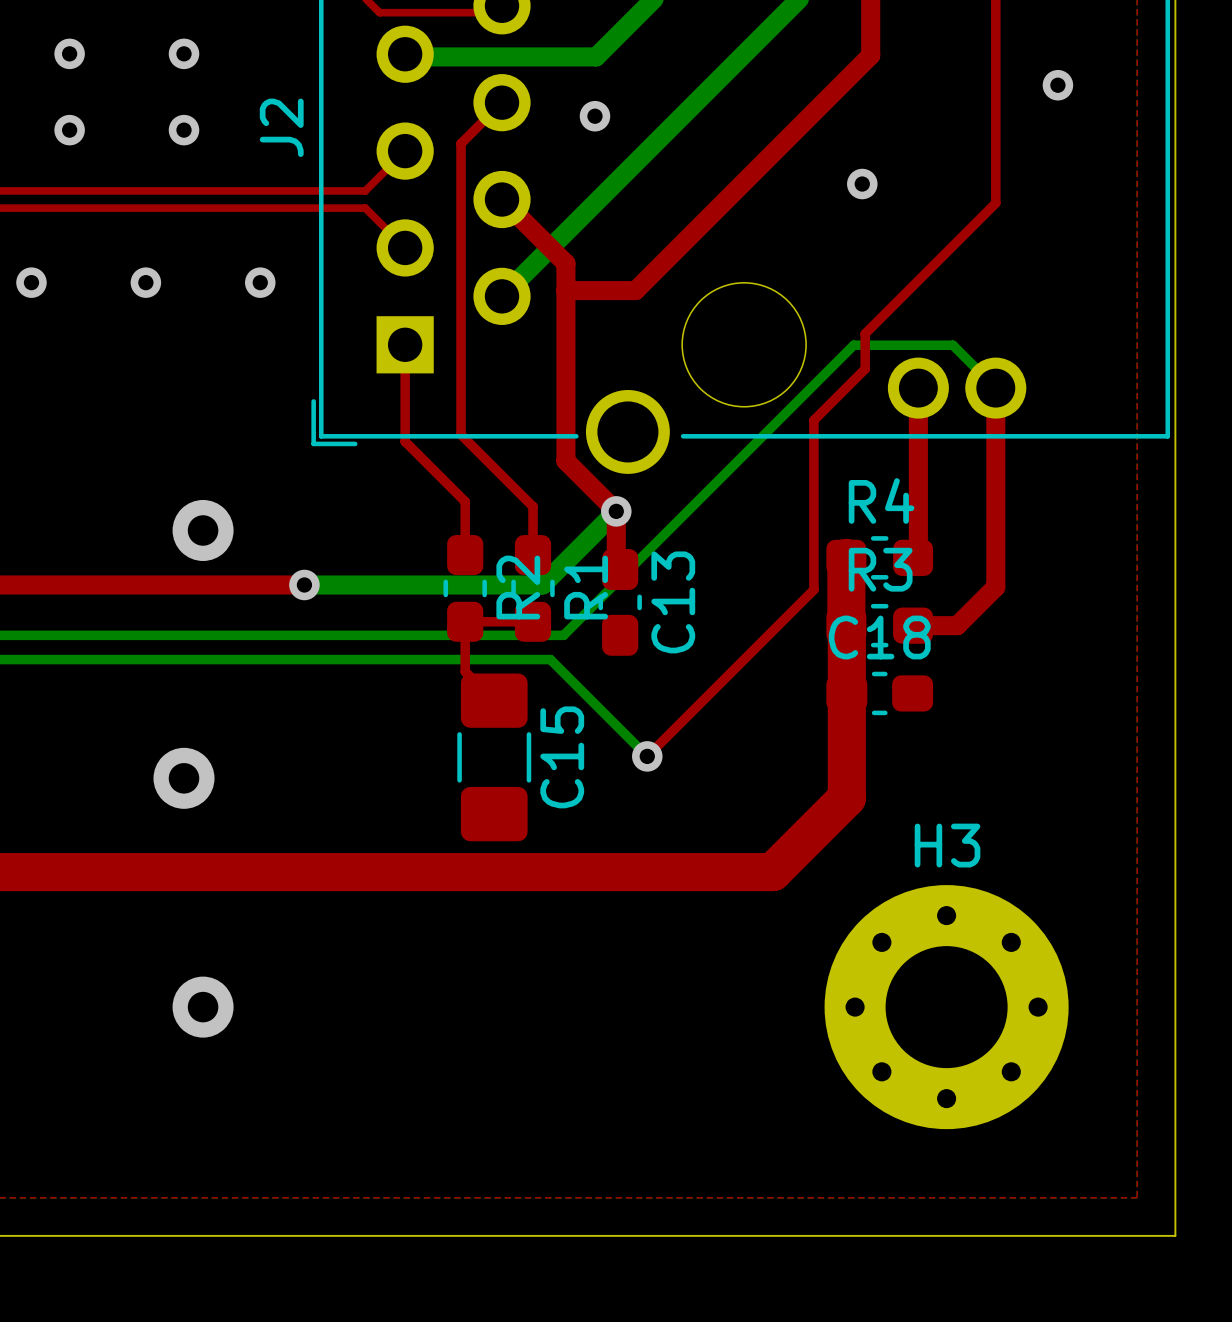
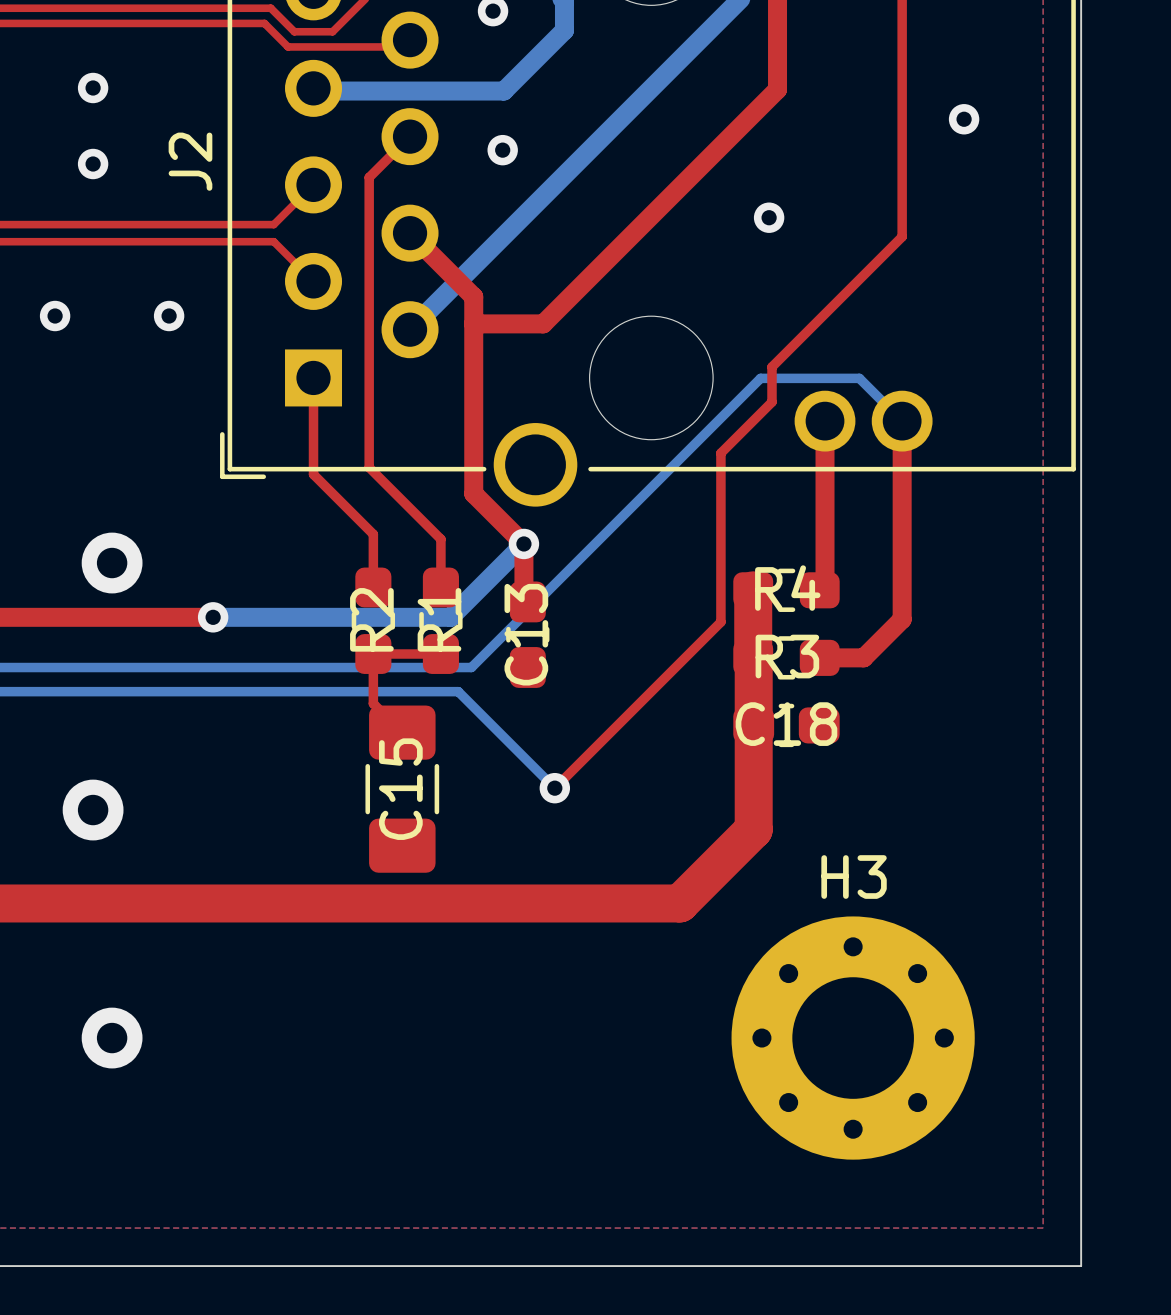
R4 name position: R4 (881, 501) -> R4 (787, 588)
R3 name position: R3 (880, 569) -> R3 (787, 656)
R2 name position: R2 (518, 587) -> R2 (371, 619)
R1 name position: R1 (586, 587) -> R1 (439, 619)
C13 name position: C13 (673, 602) -> C13 (526, 634)
C18 name position: C18 (879, 637) -> C18 (786, 724)
C15 name position: C15 (562, 757) -> C15 (400, 789)

